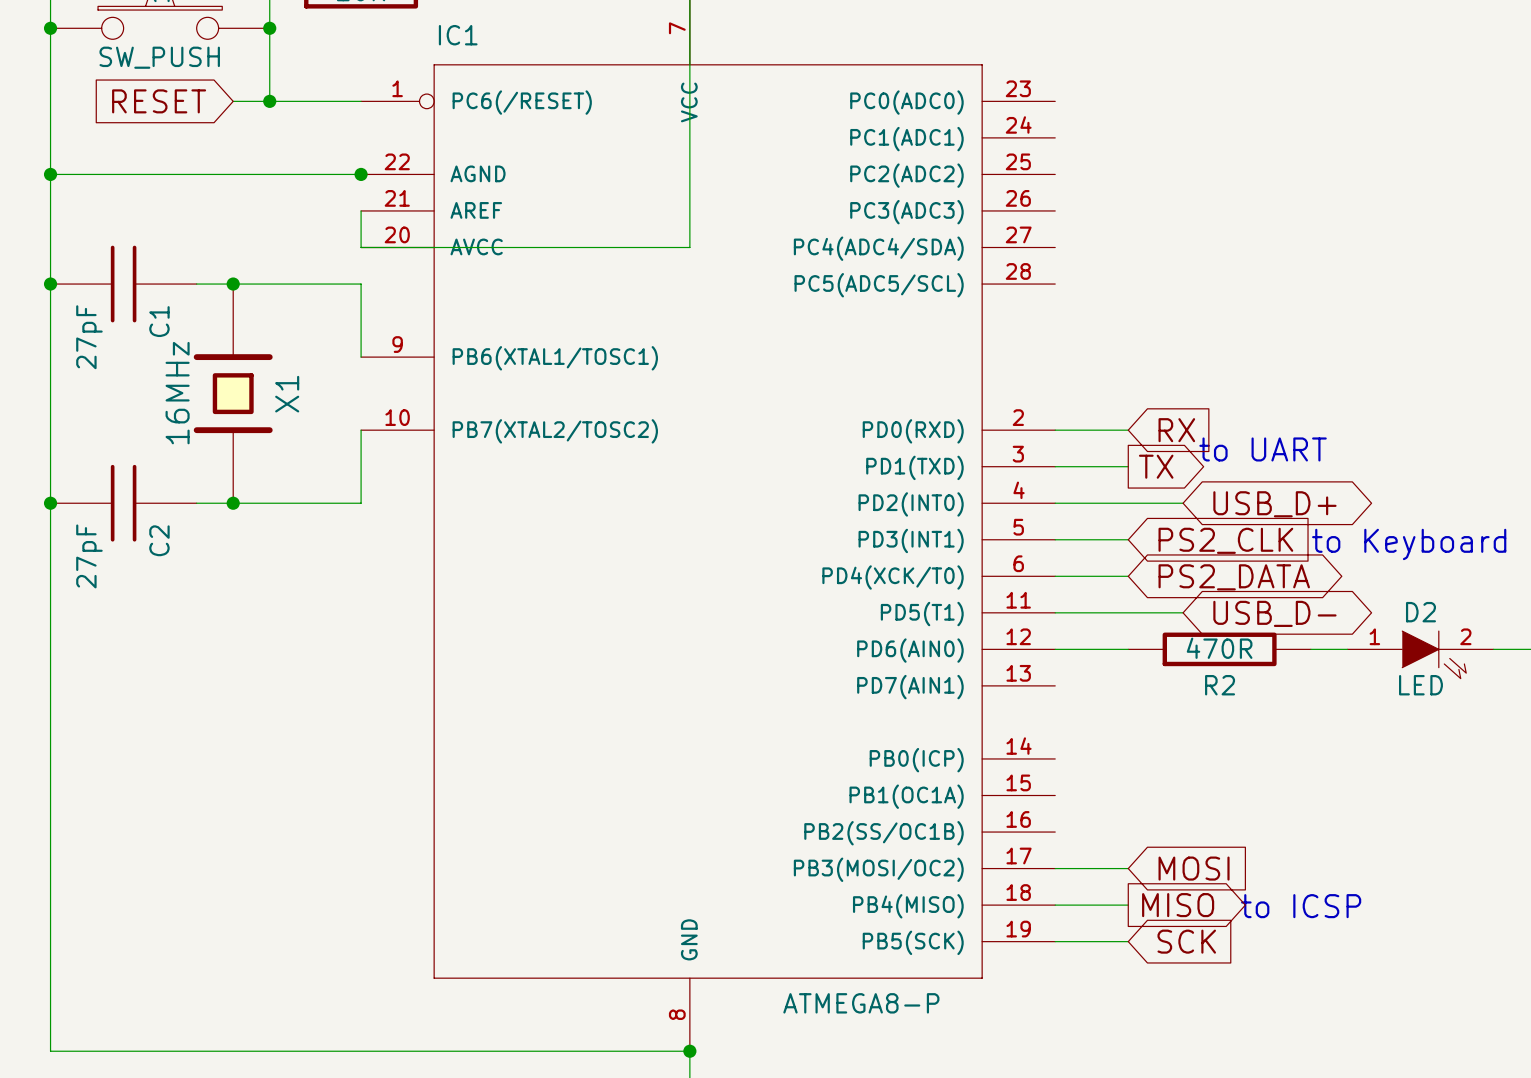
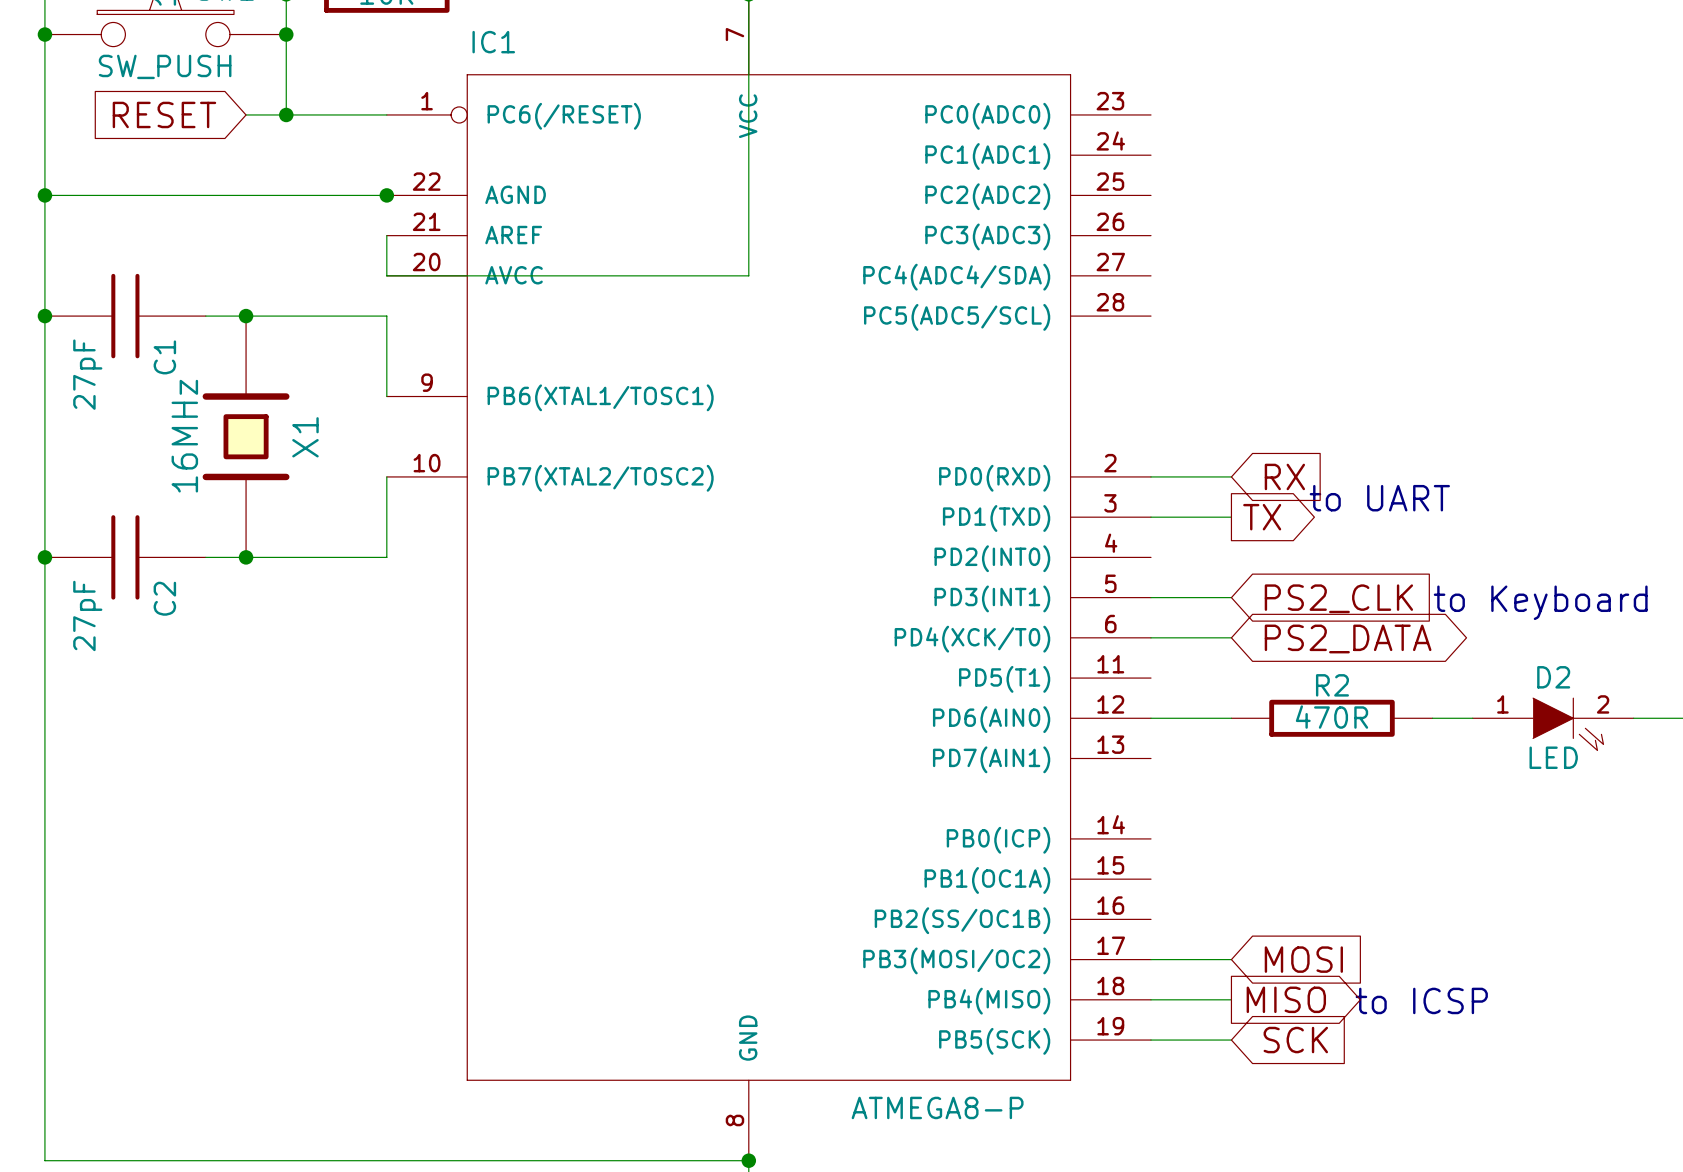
wire: (1055, 503) (1183, 503) -> none
global label: USB_D+ (1274, 504) -> none
wire: (1055, 612) (1183, 612) -> none
global label: USB_D- (1274, 613) -> none
R2 name position: R2 (1220, 685) -> R2 (1332, 685)

